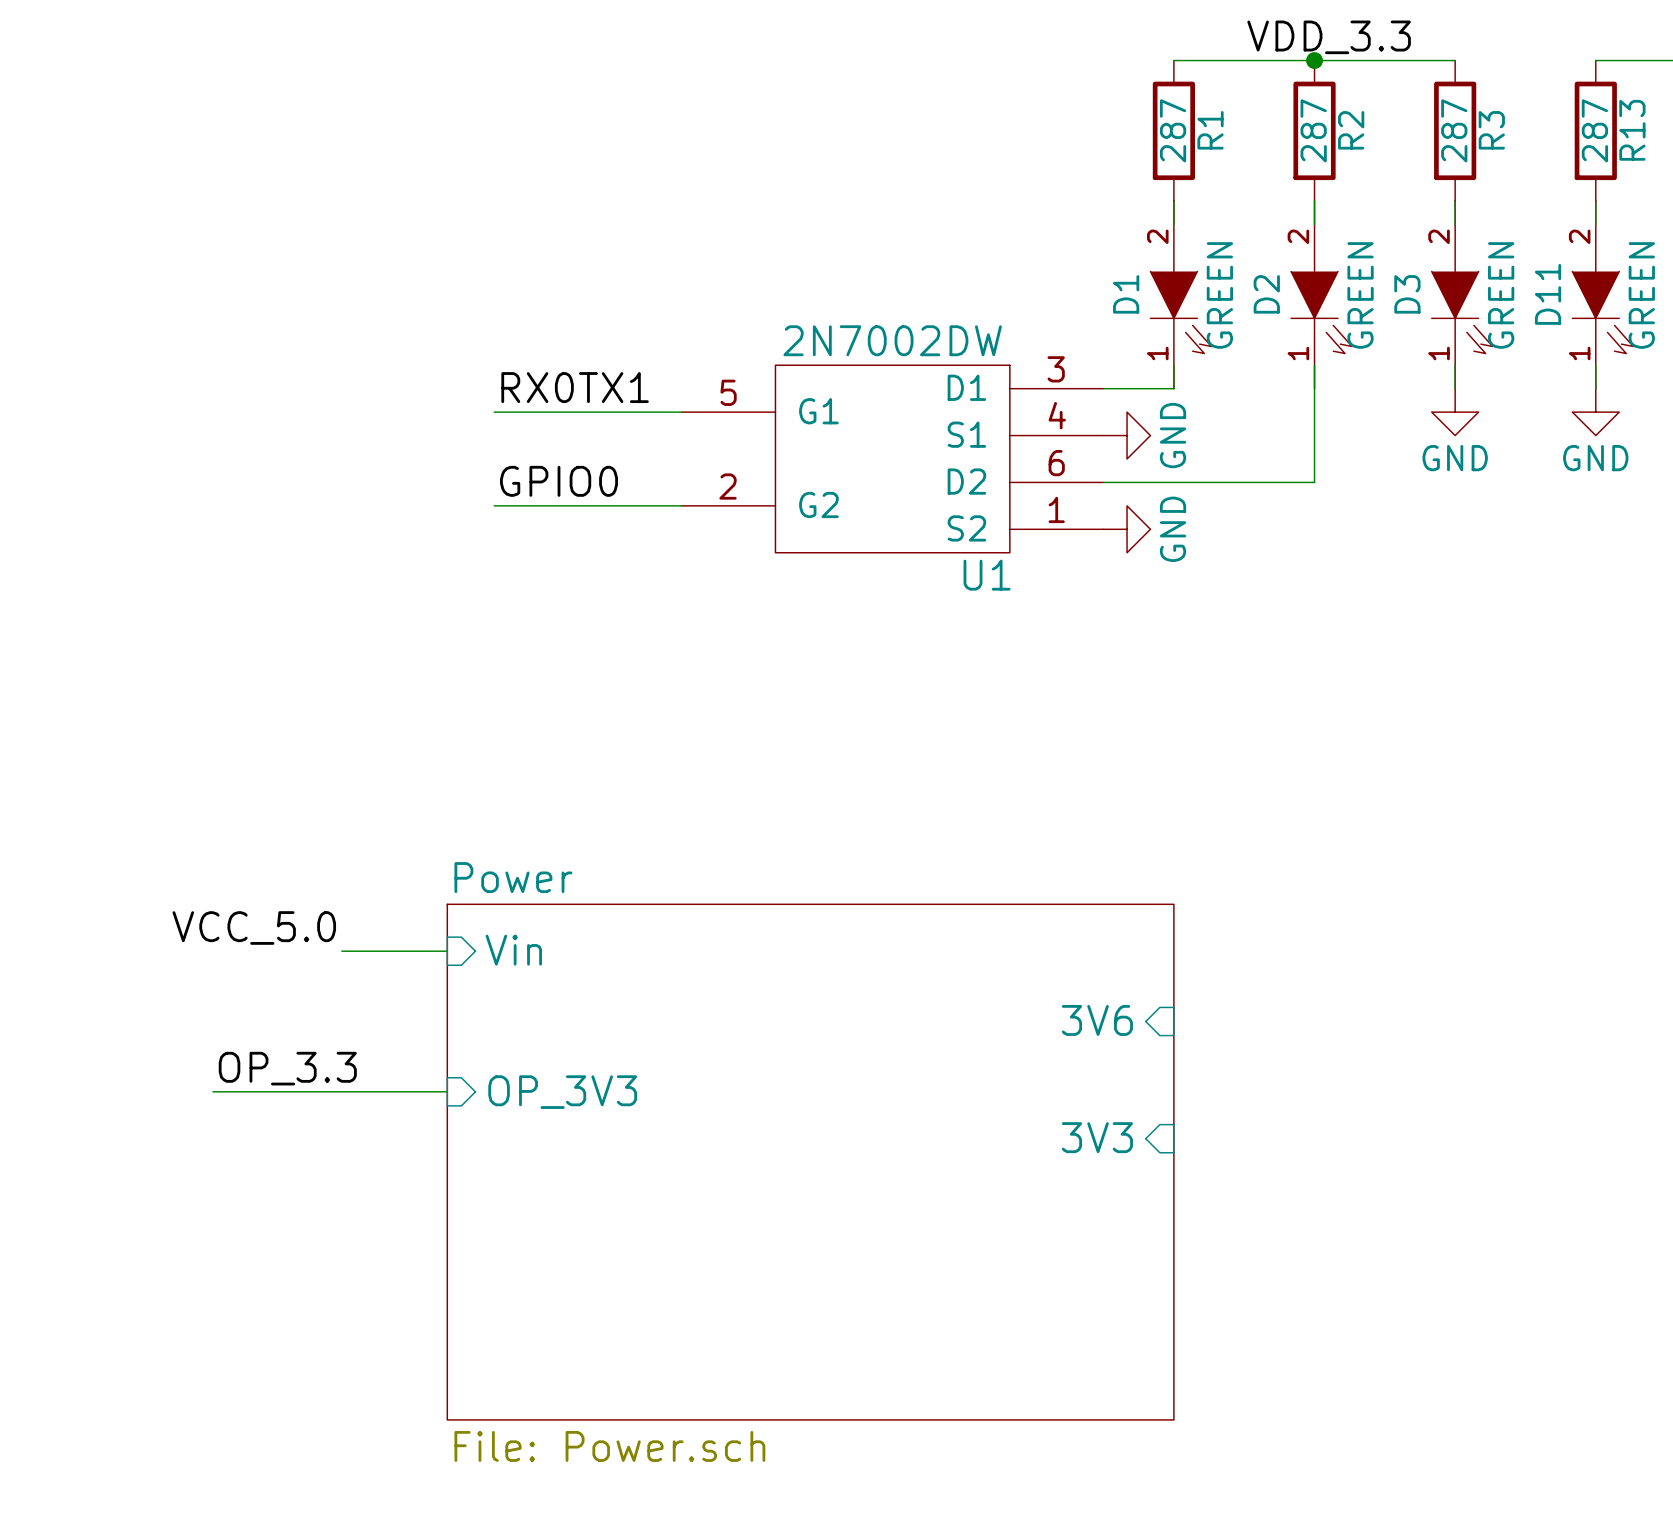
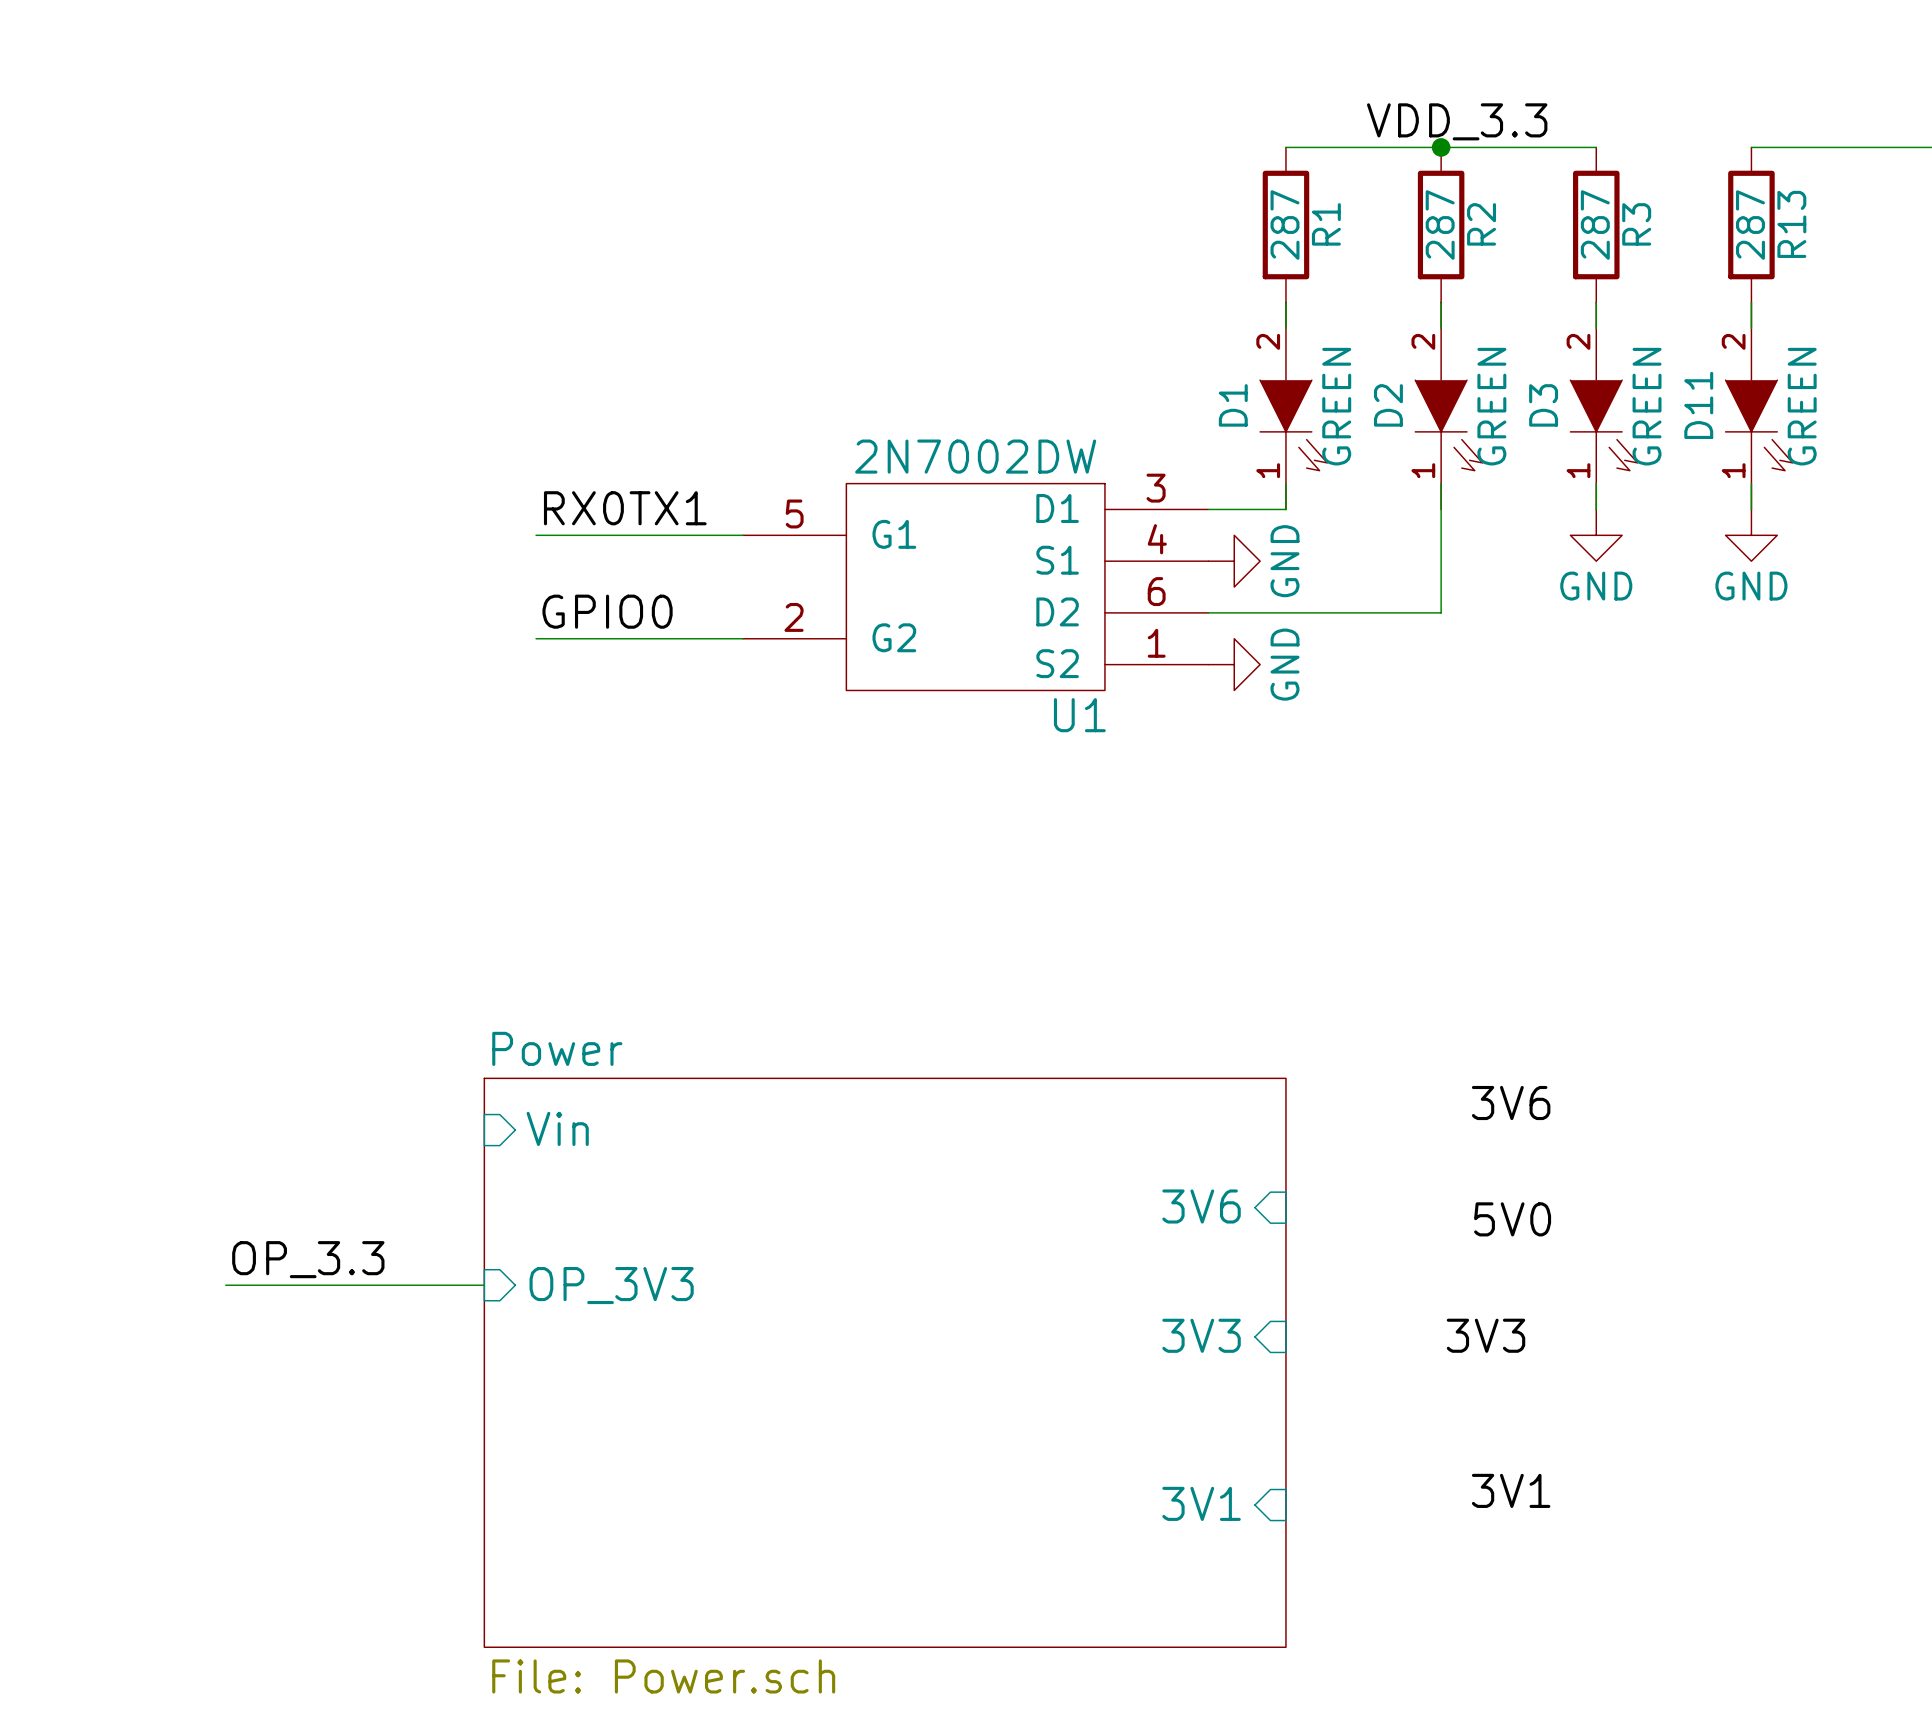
label: none -> 3V6 (1511, 1103)
label: VCC_5.0 (254, 928) -> none
wire: (341, 951) (447, 951) -> none
label: none -> 5V0 (1512, 1219)
label: none -> 3V3 (1486, 1335)
label: none -> 3V1 (1511, 1490)
sheet pin: none -> 3V1 (1201, 1503)

